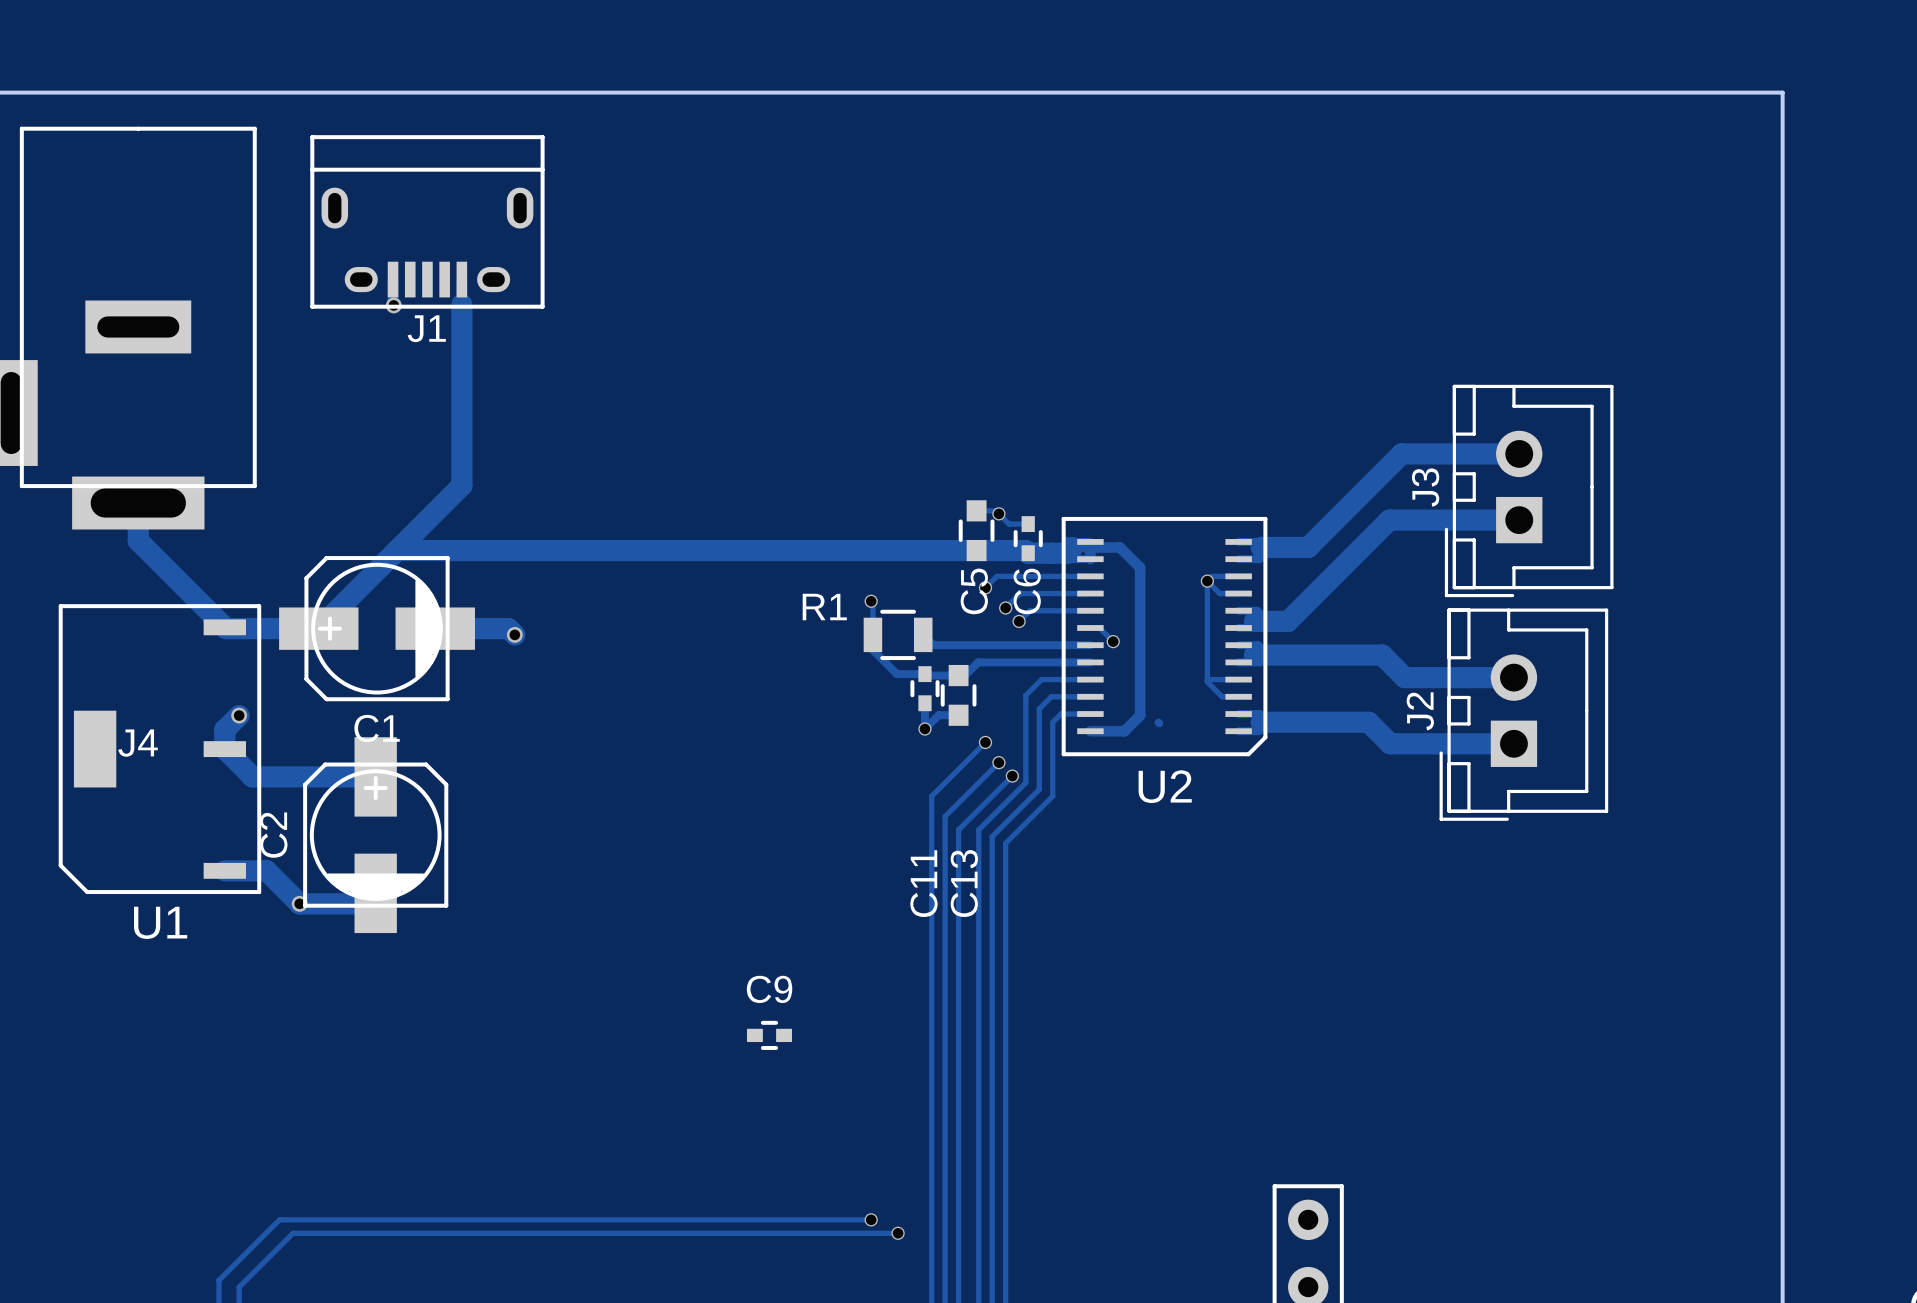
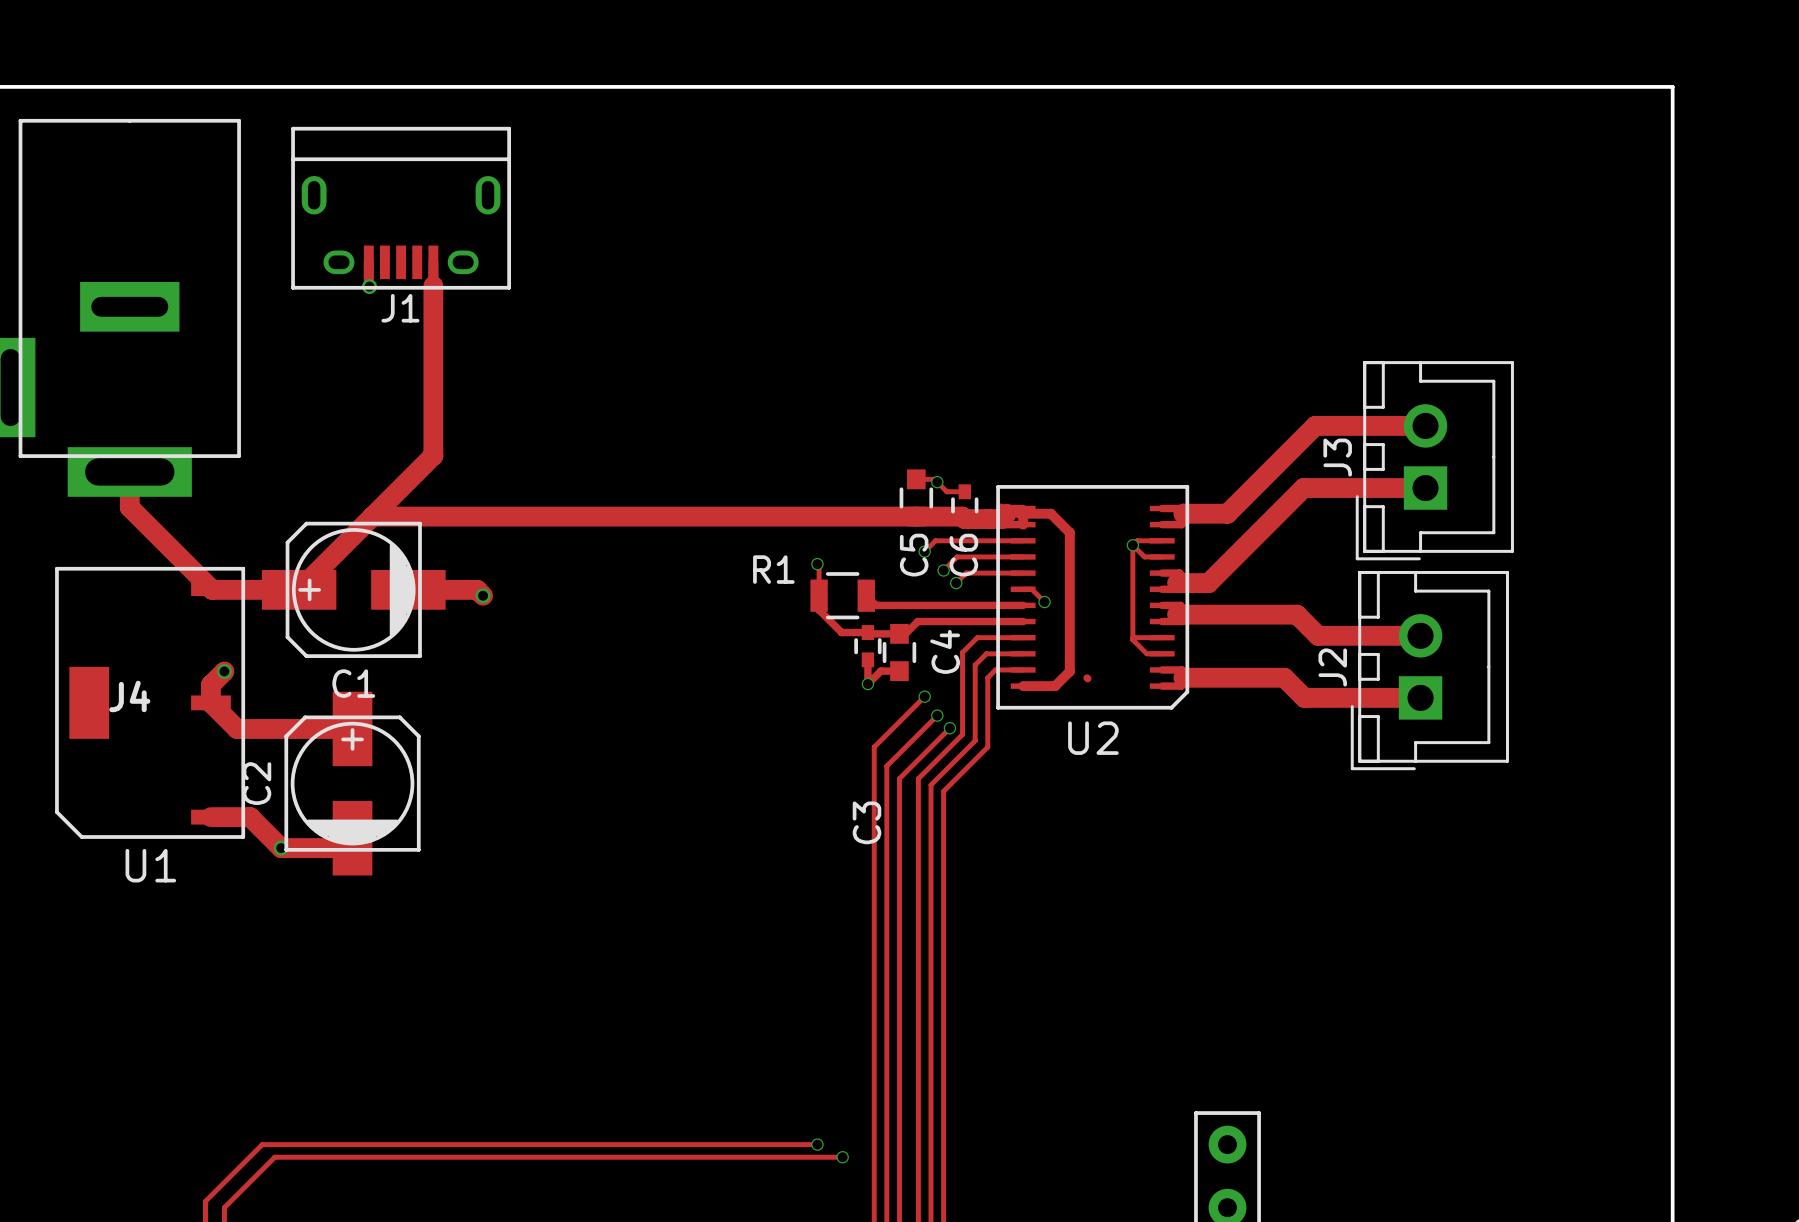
C11 name: C11 (923, 883) -> C3 (866, 822)
C13 name: C13 (964, 883) -> C4 (945, 651)
C9: (769, 1035) -> none

